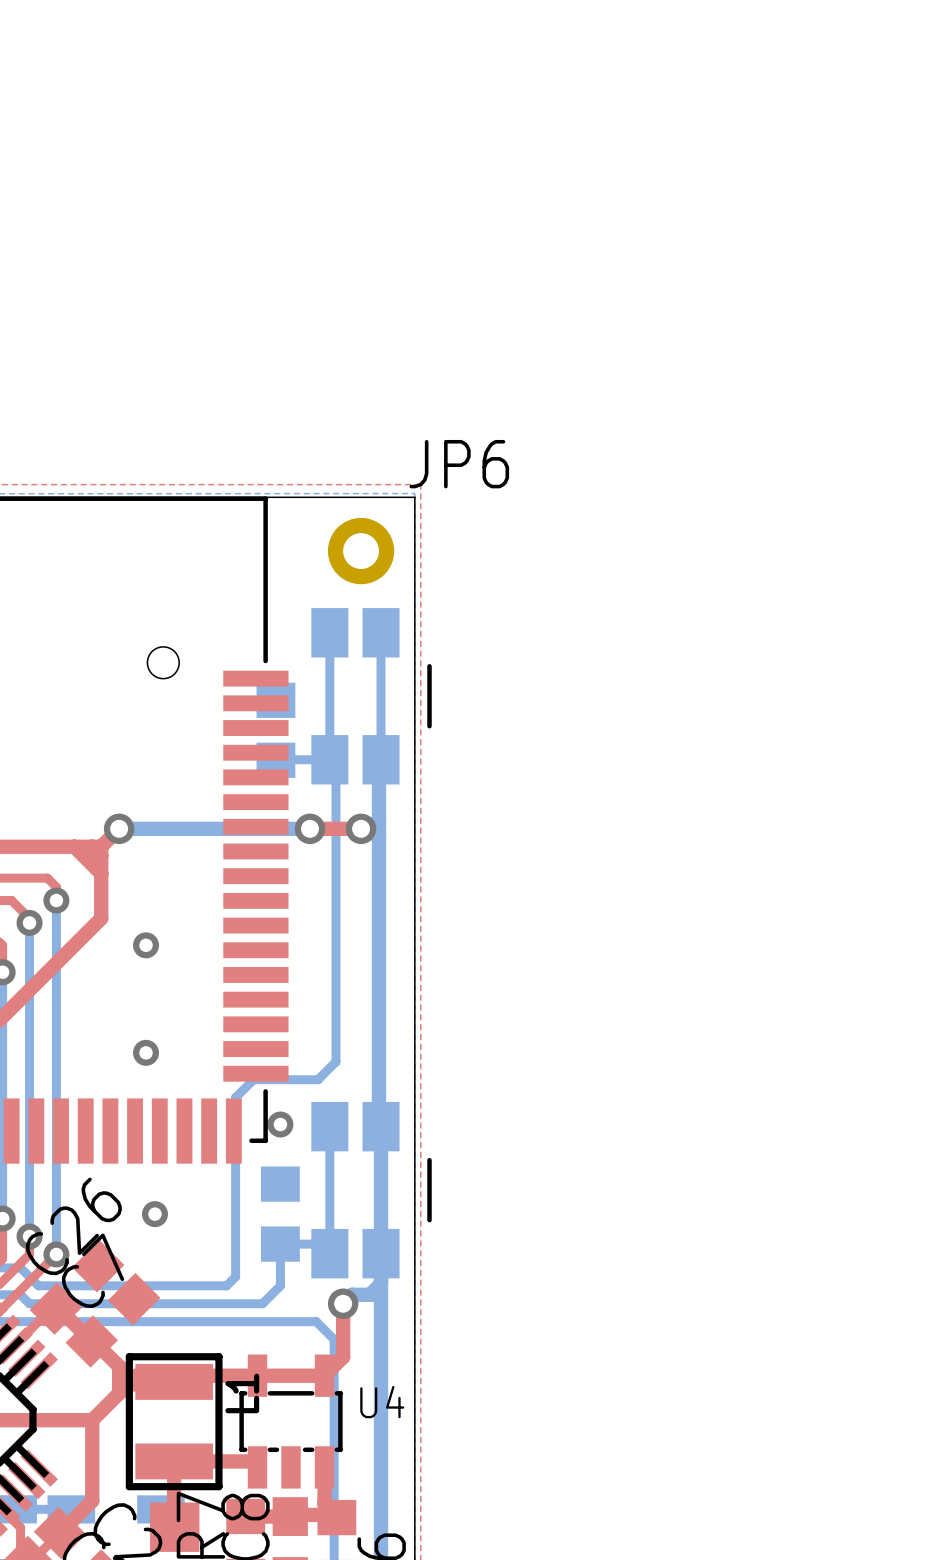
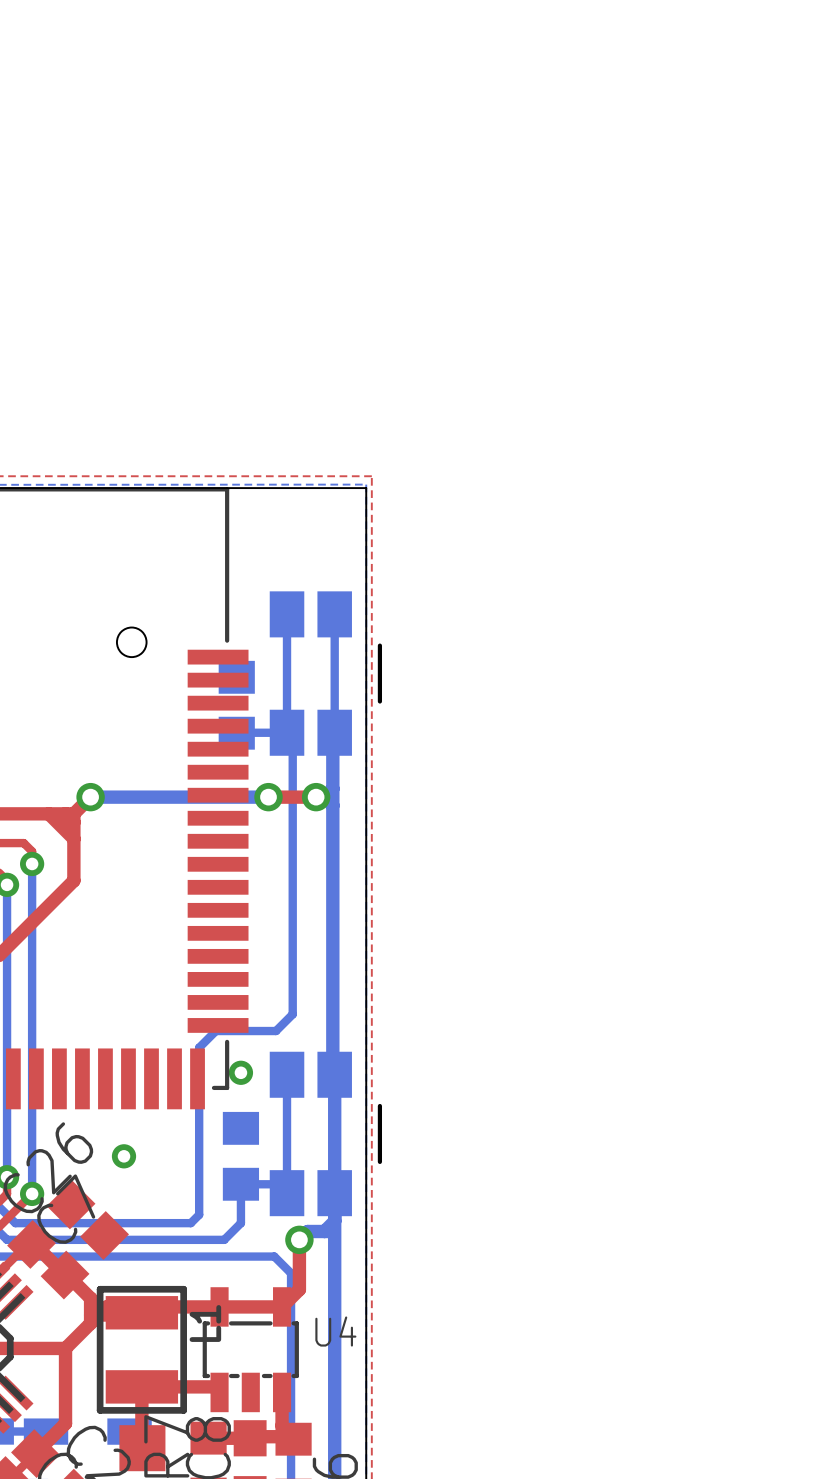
JP6: (361, 551) -> none
via: (146, 945) -> none
via: (146, 1052) -> none

